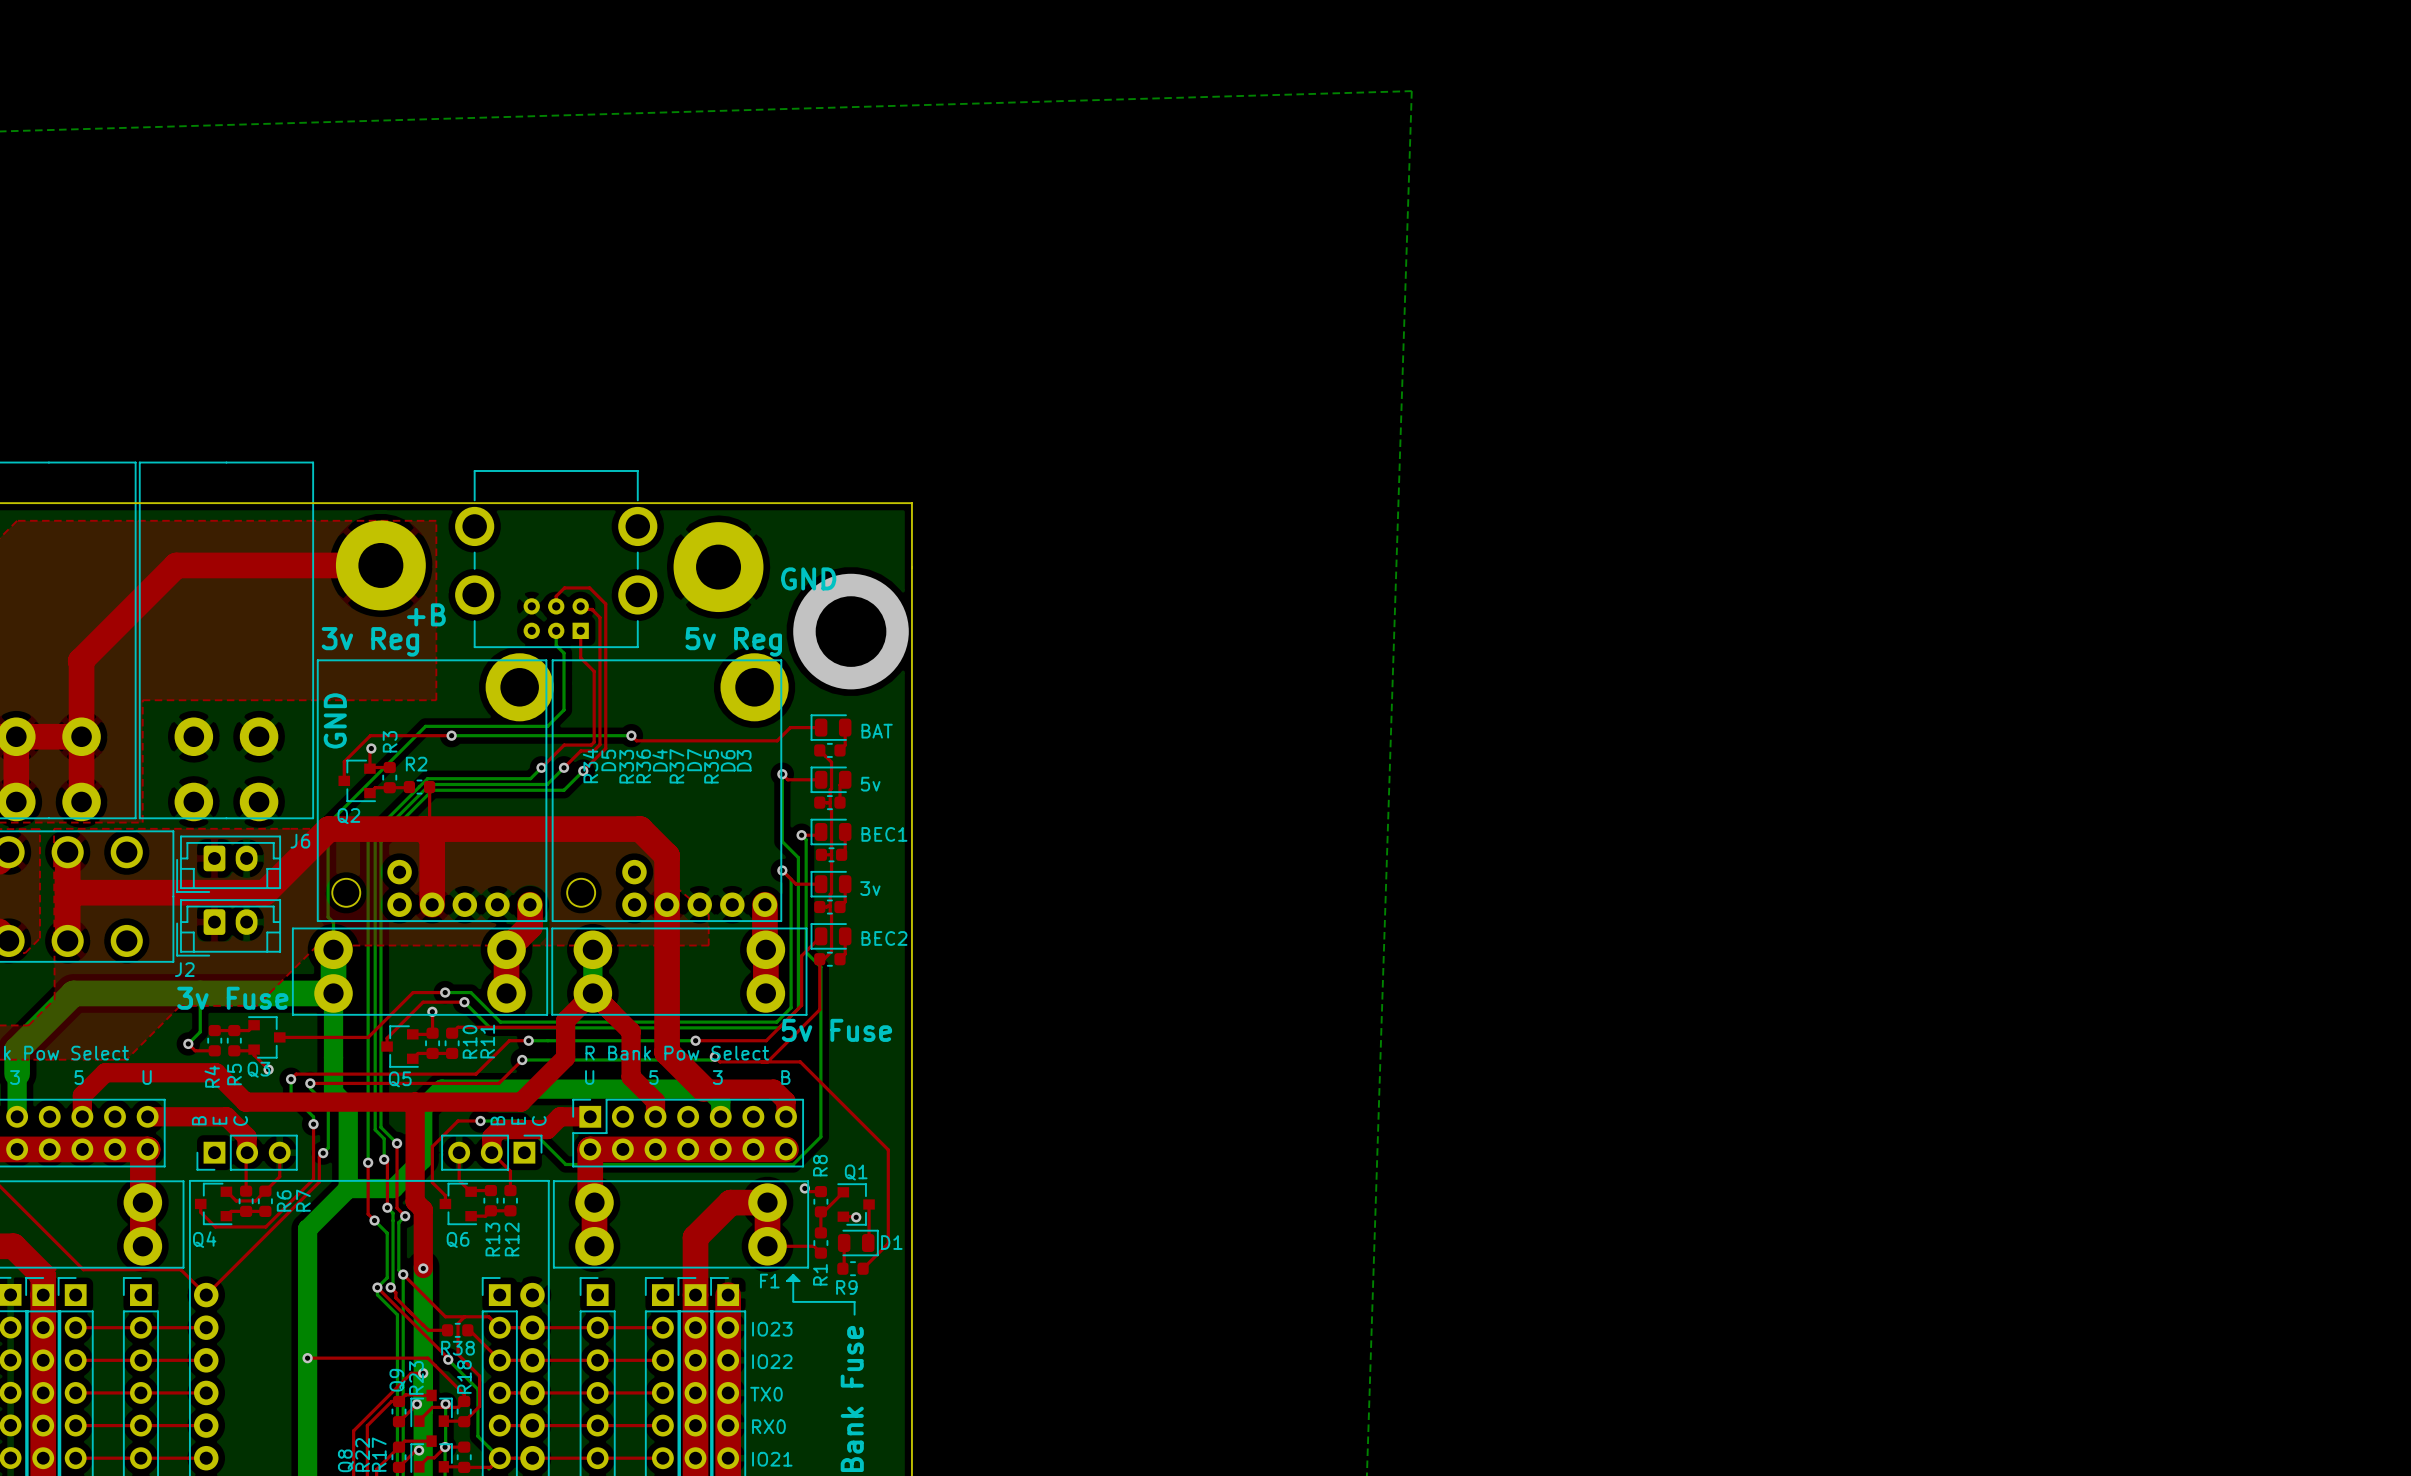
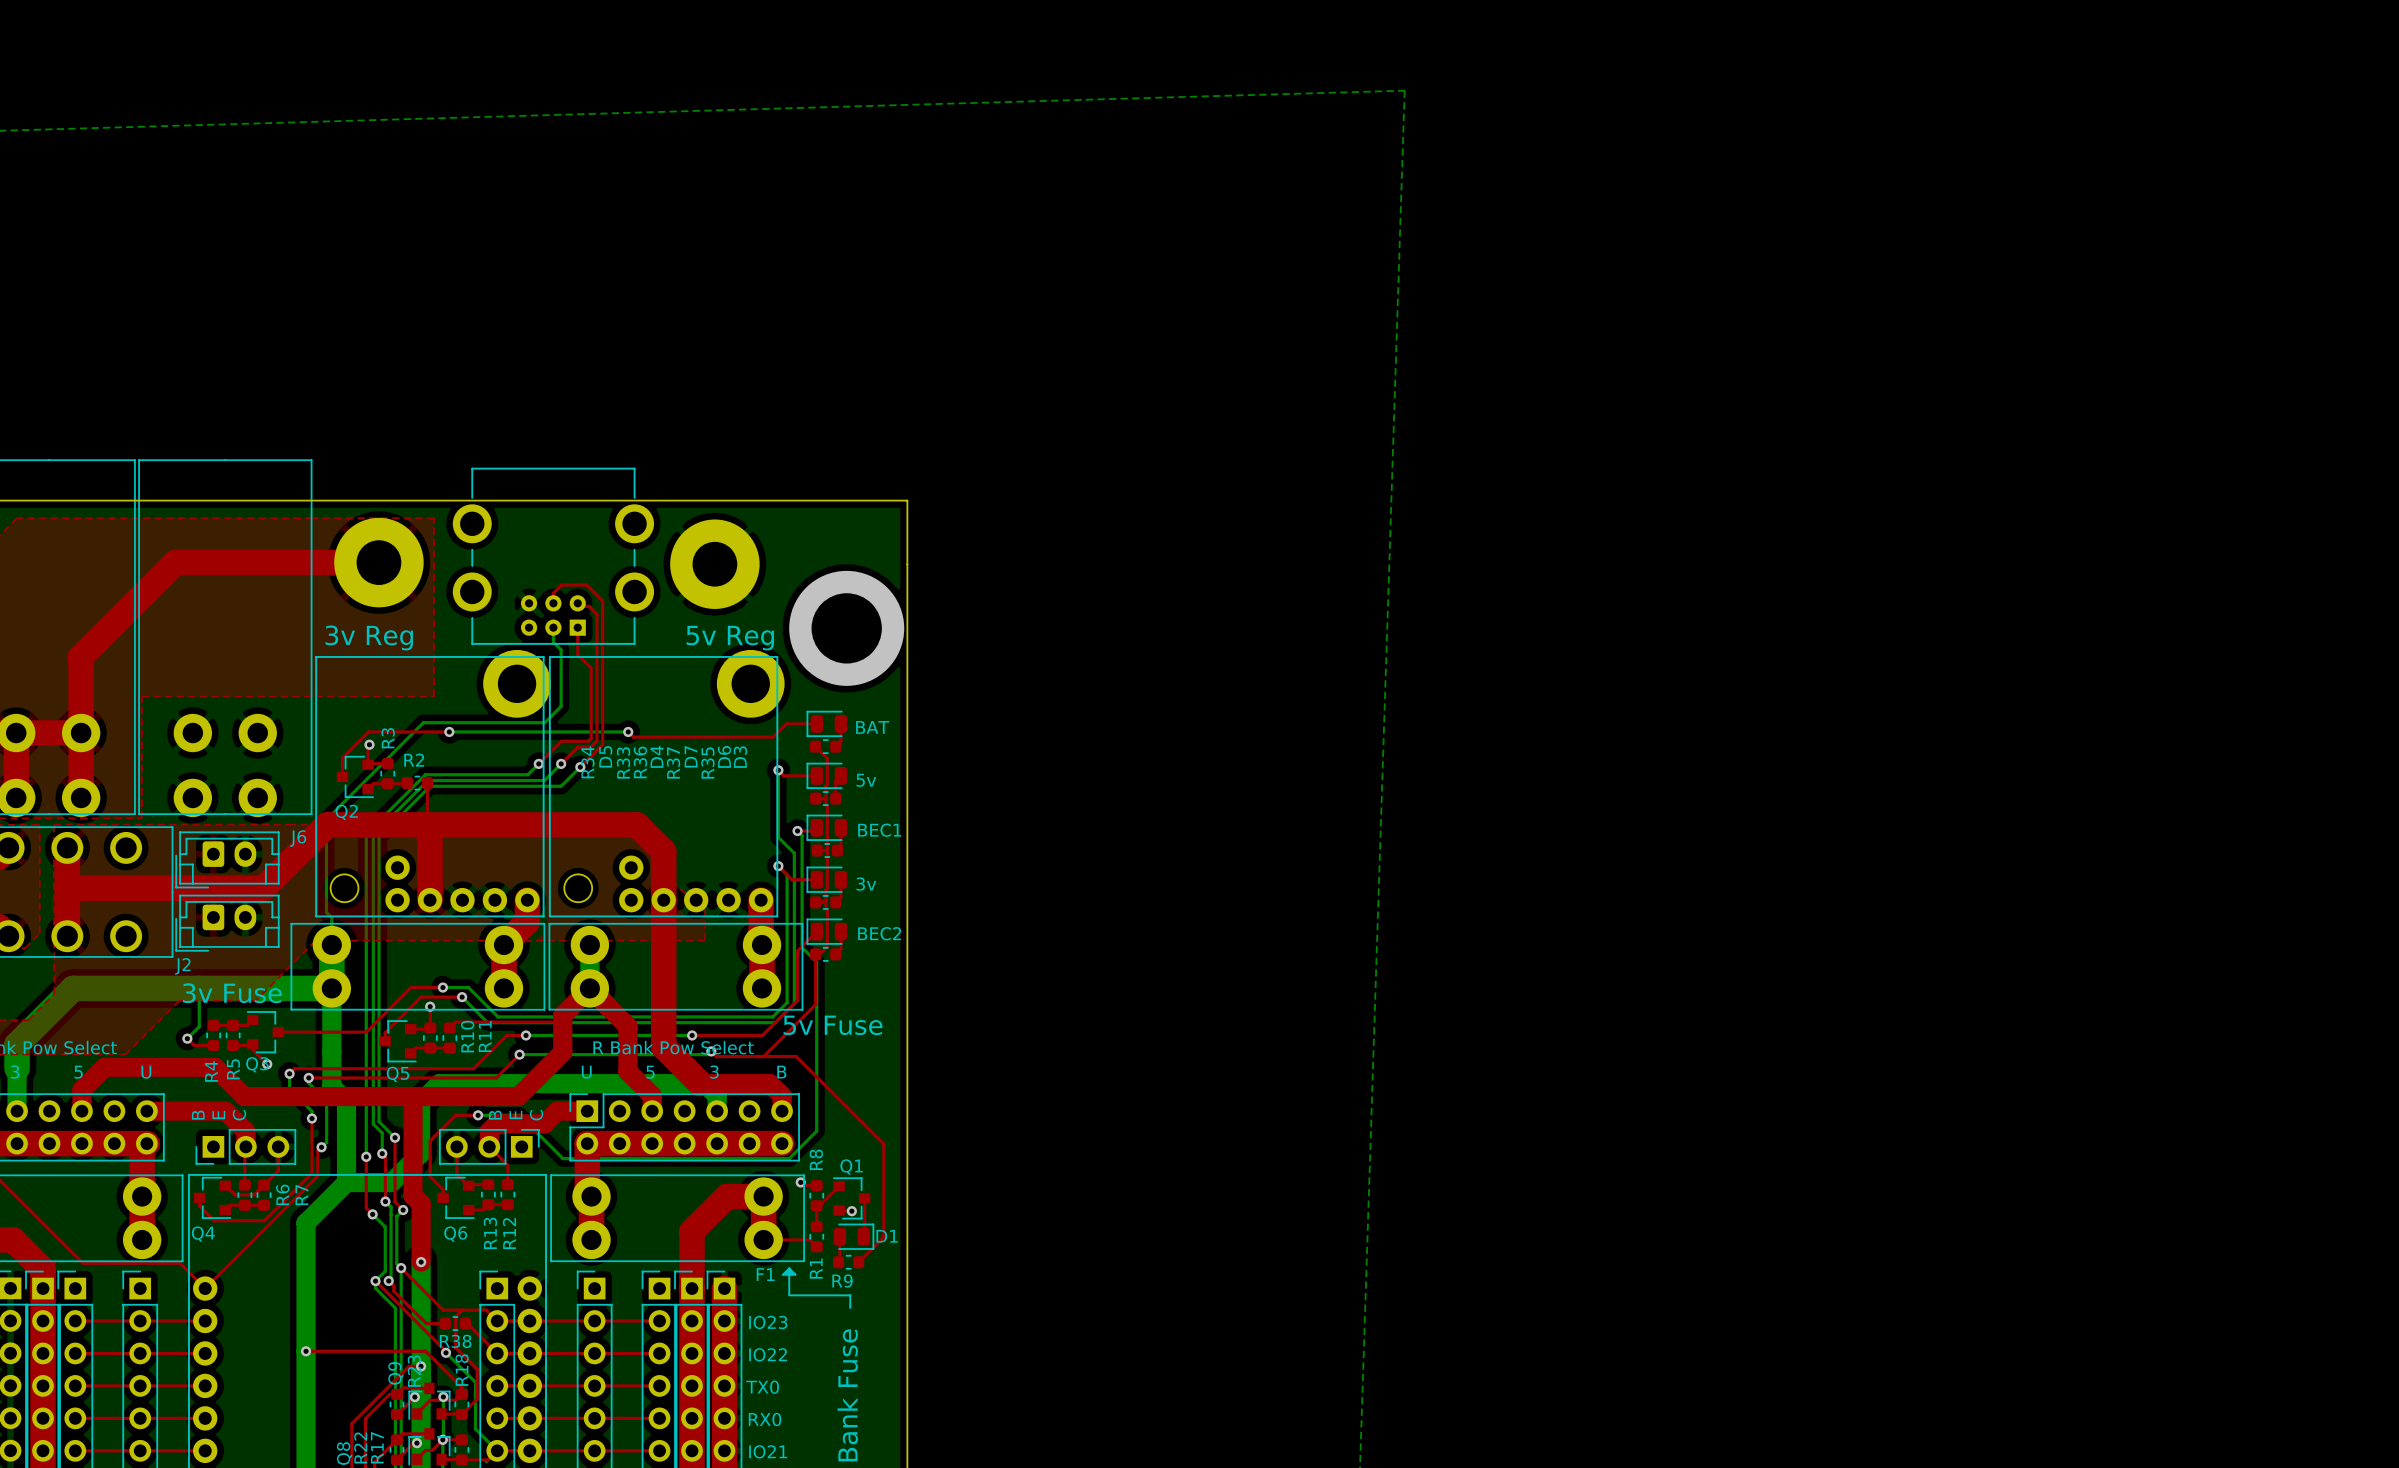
text: GND (808, 578) -> none
text: +B (426, 614) -> none
text: GND (335, 720) -> none

